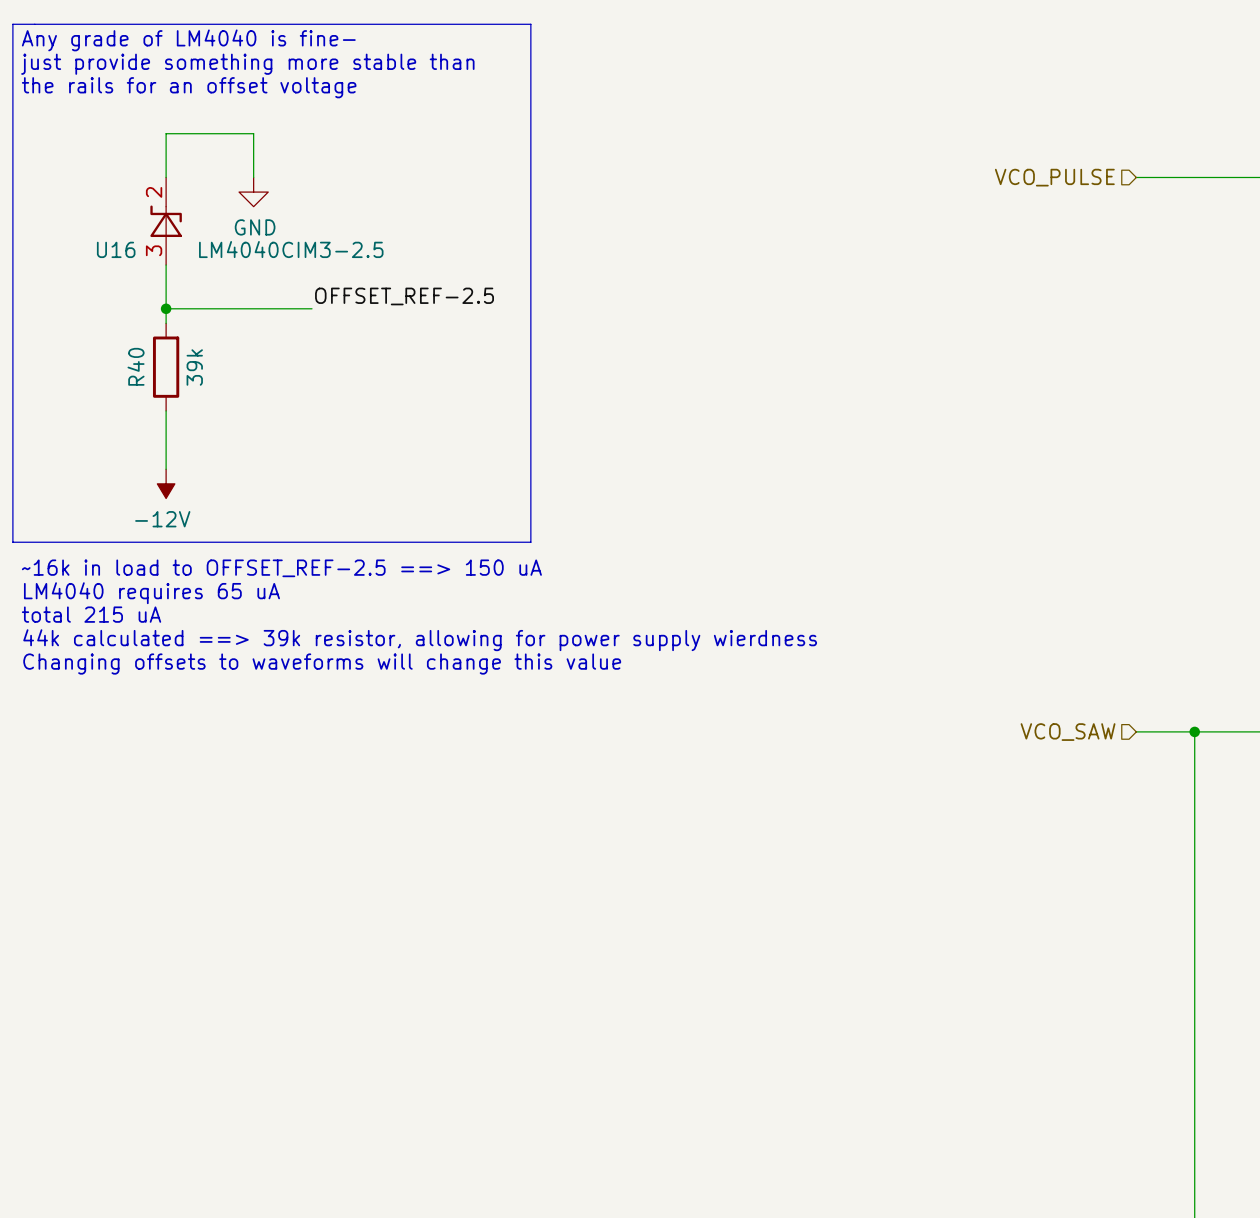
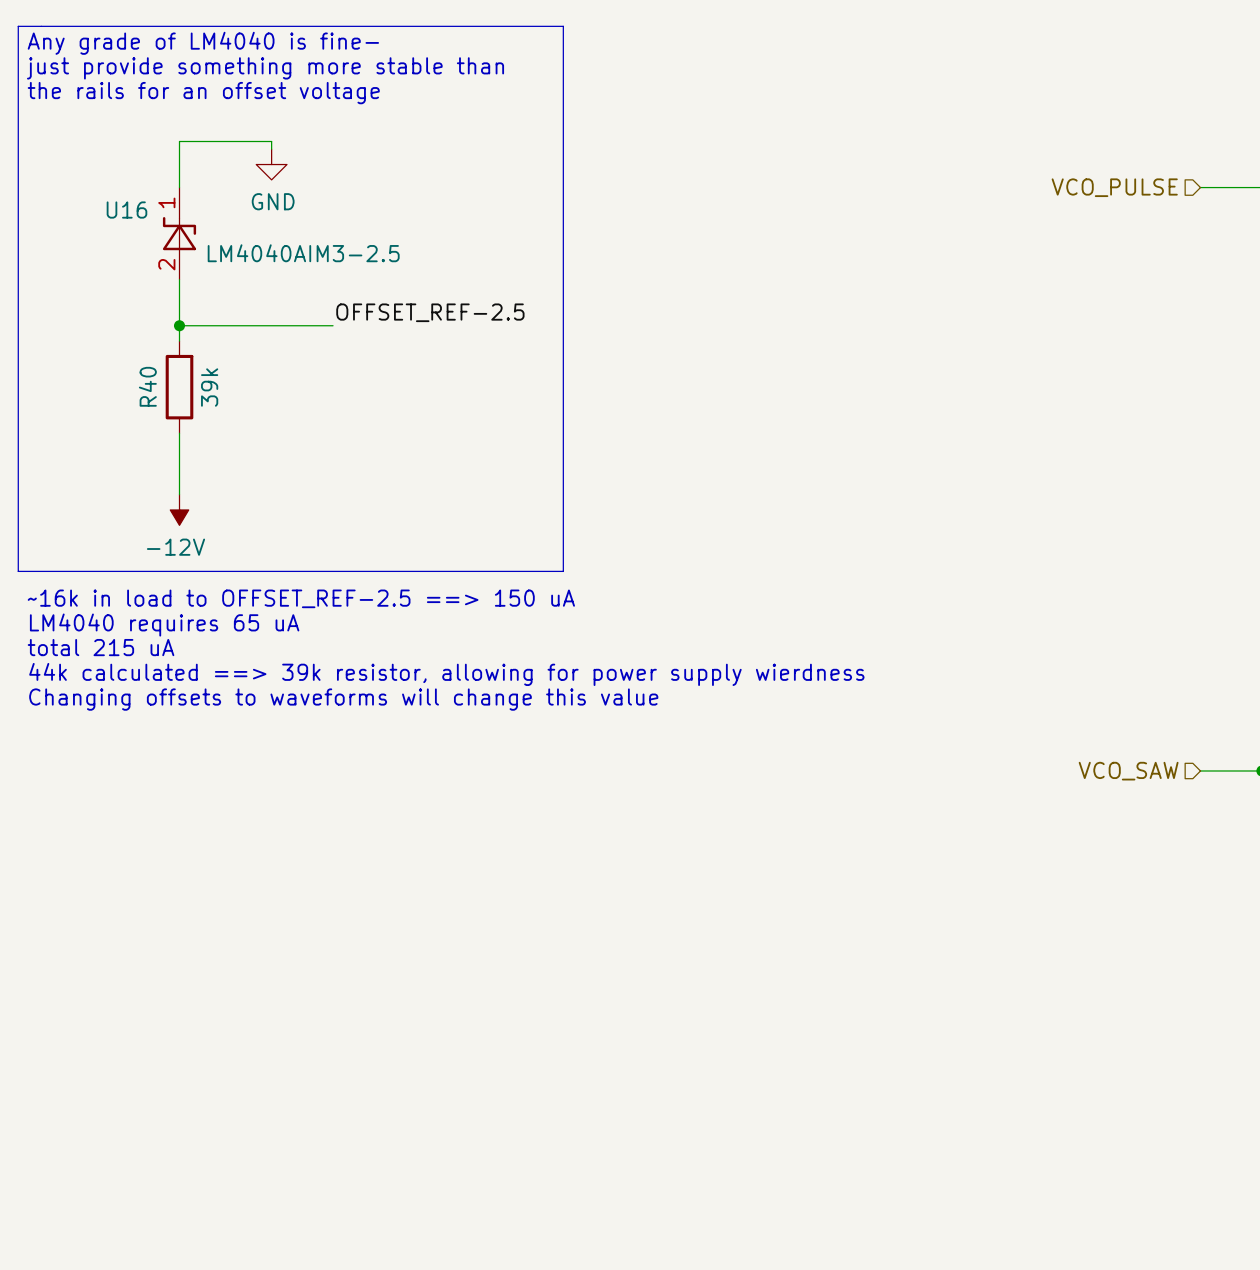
wire: (253, 141) (253, 177) -> none
U16 pin number: 2 (154, 192) -> 1 (166, 202)
power symbol position: GND (253, 192) -> GND (271, 164)
U16 name position: U16 (116, 249) -> U16 (126, 210)
U16 value: LM4040CIM3-2.5 (291, 249) -> LM4040AIM3-2.5 (303, 253)
U16 pin number: 3 (154, 250) -> 2 (166, 264)

